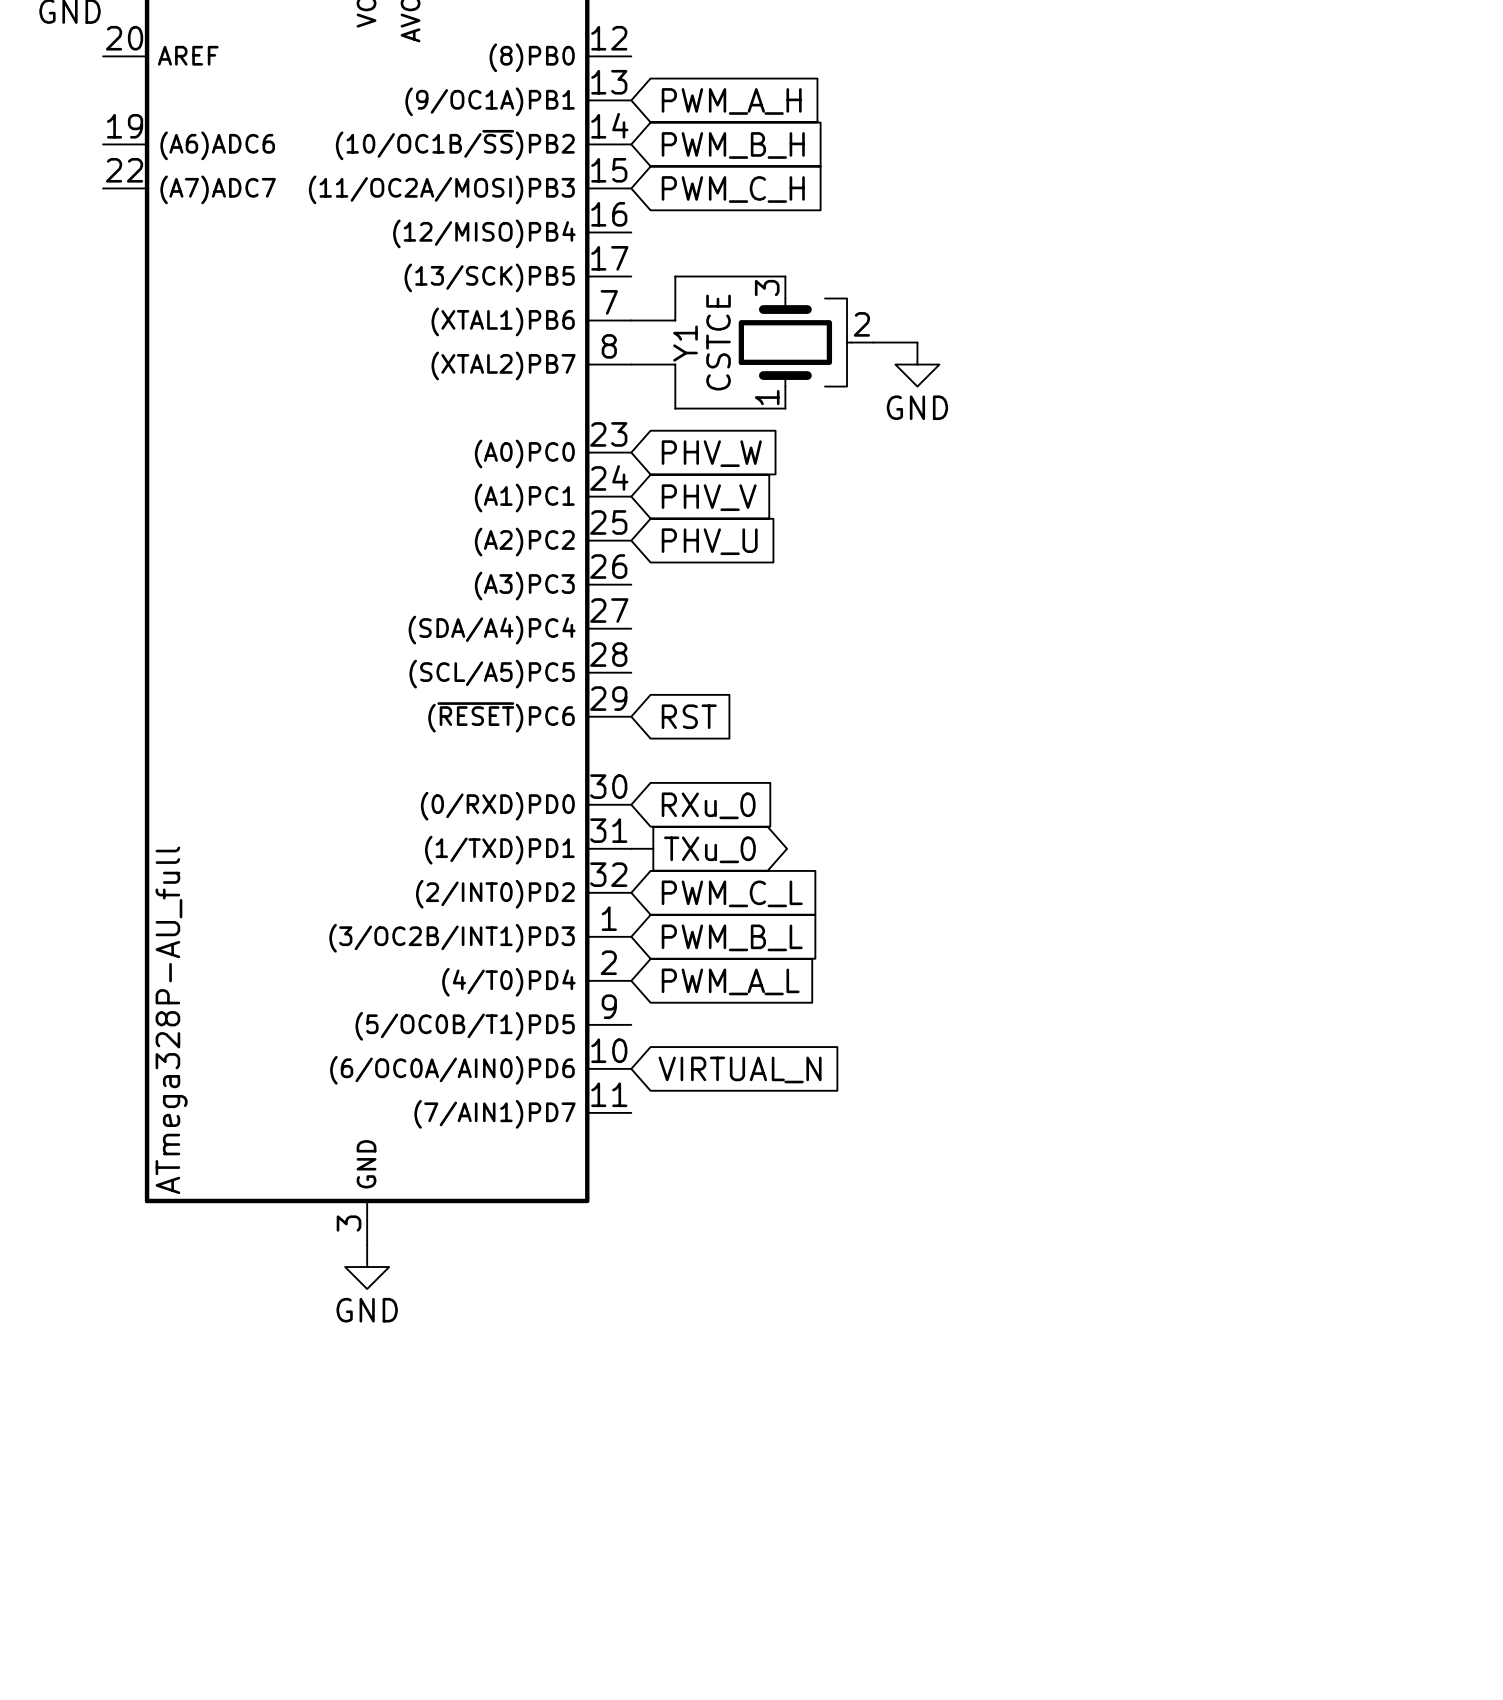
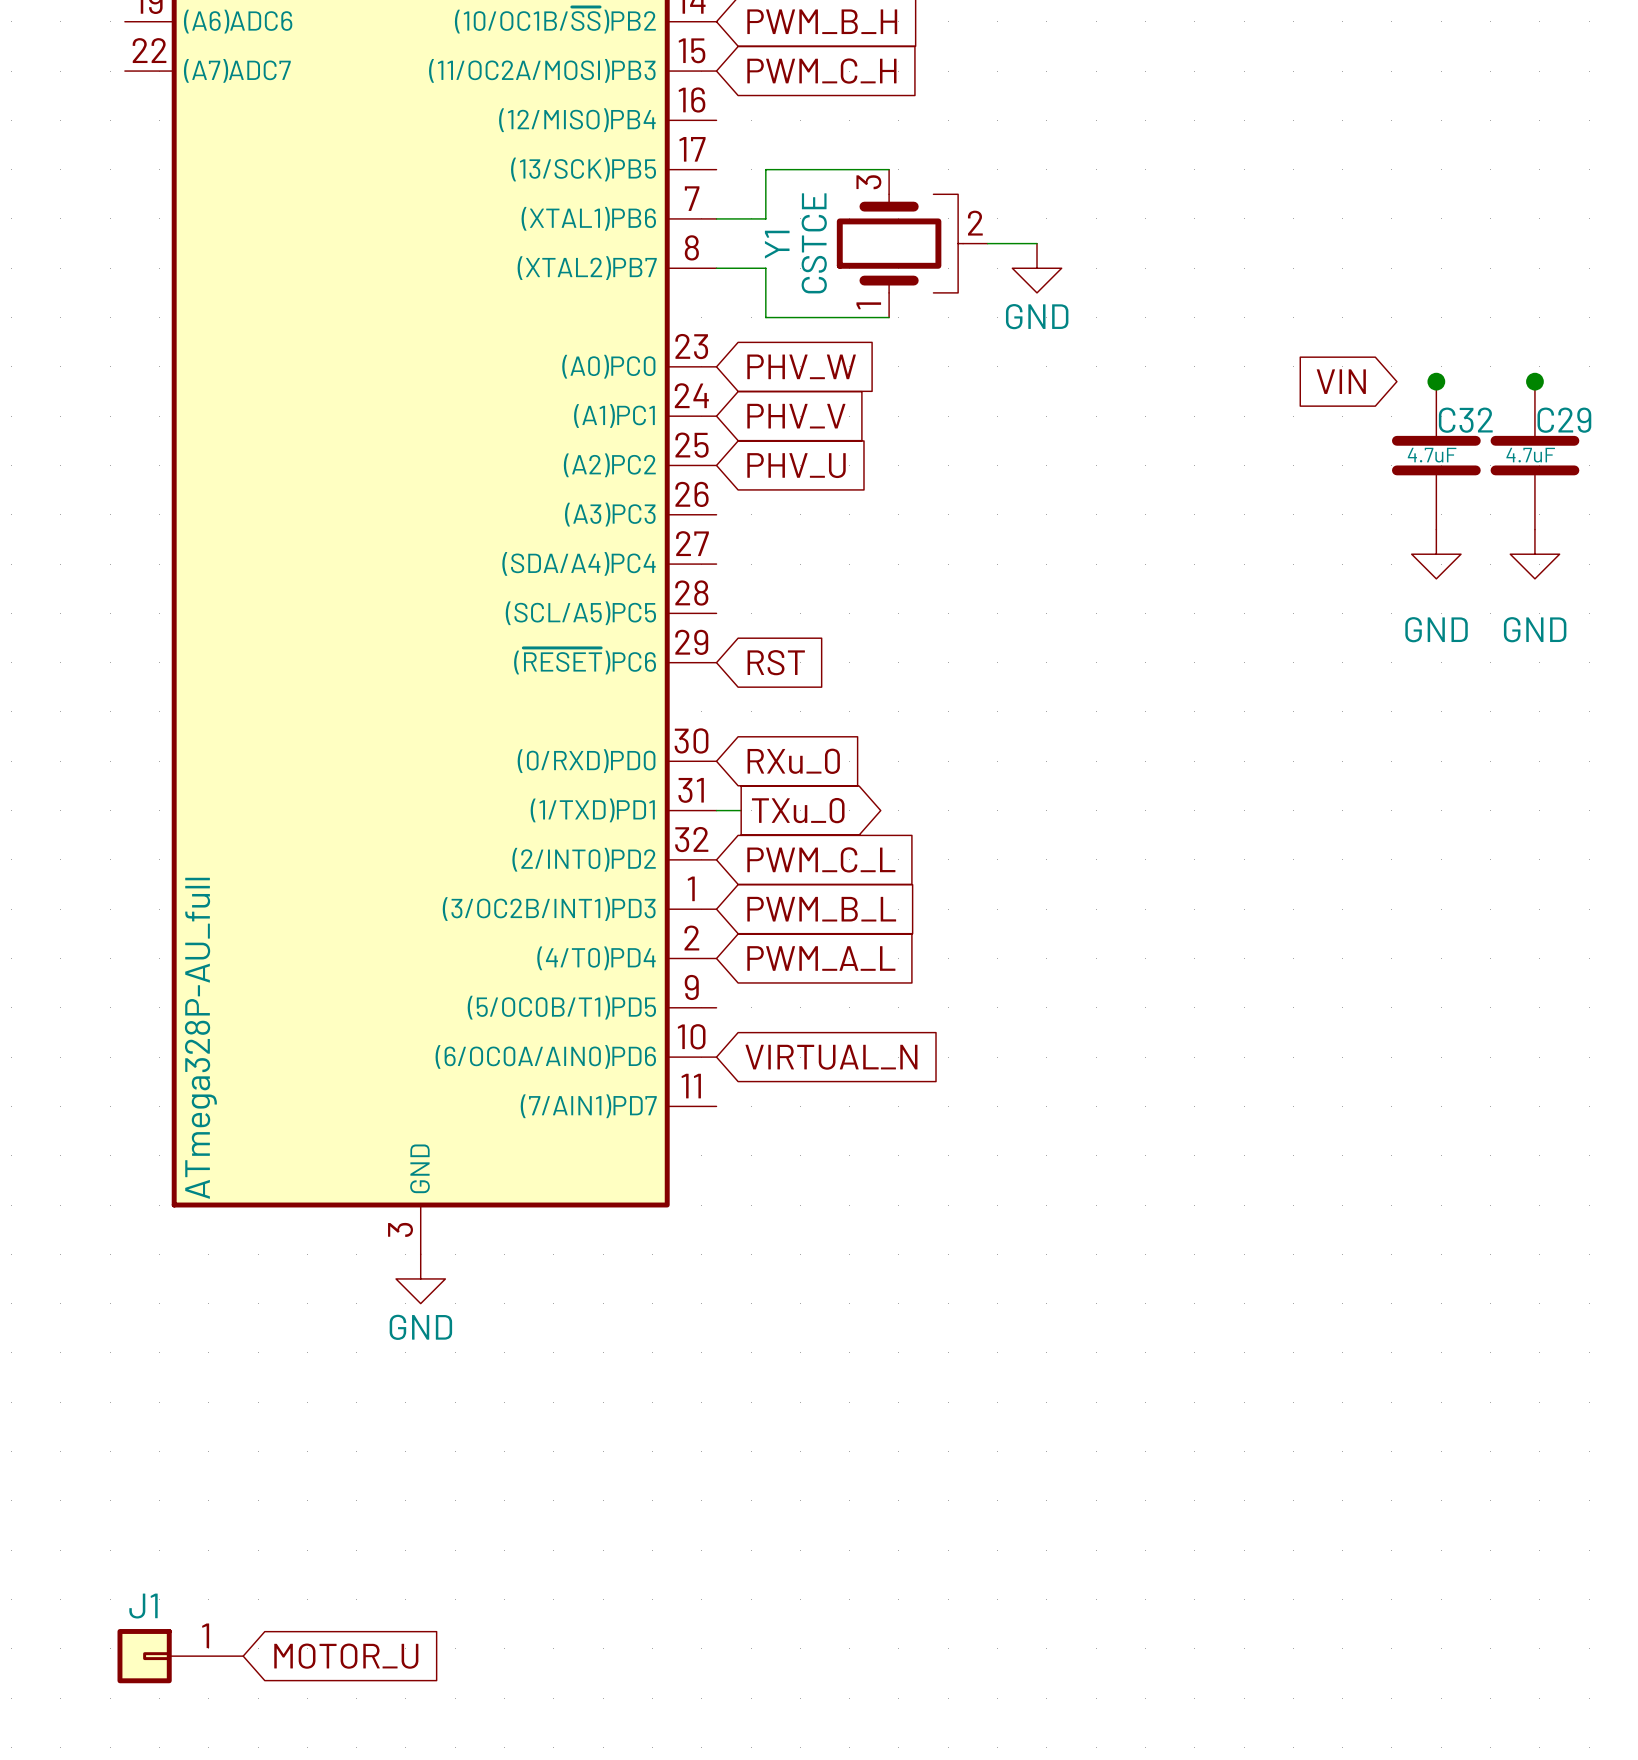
global label: none -> VIN (1341, 381)
junction: none -> (1436, 381)
junction: none -> (1534, 381)
C32: none -> 4.7uF (1436, 455)
C29: none -> 4.7uF (1534, 455)
power symbol: none -> GND (1436, 554)
power symbol: none -> GND (1534, 554)
J1: none -> (180, 1656)
global label: none -> MOTOR_U (346, 1656)

